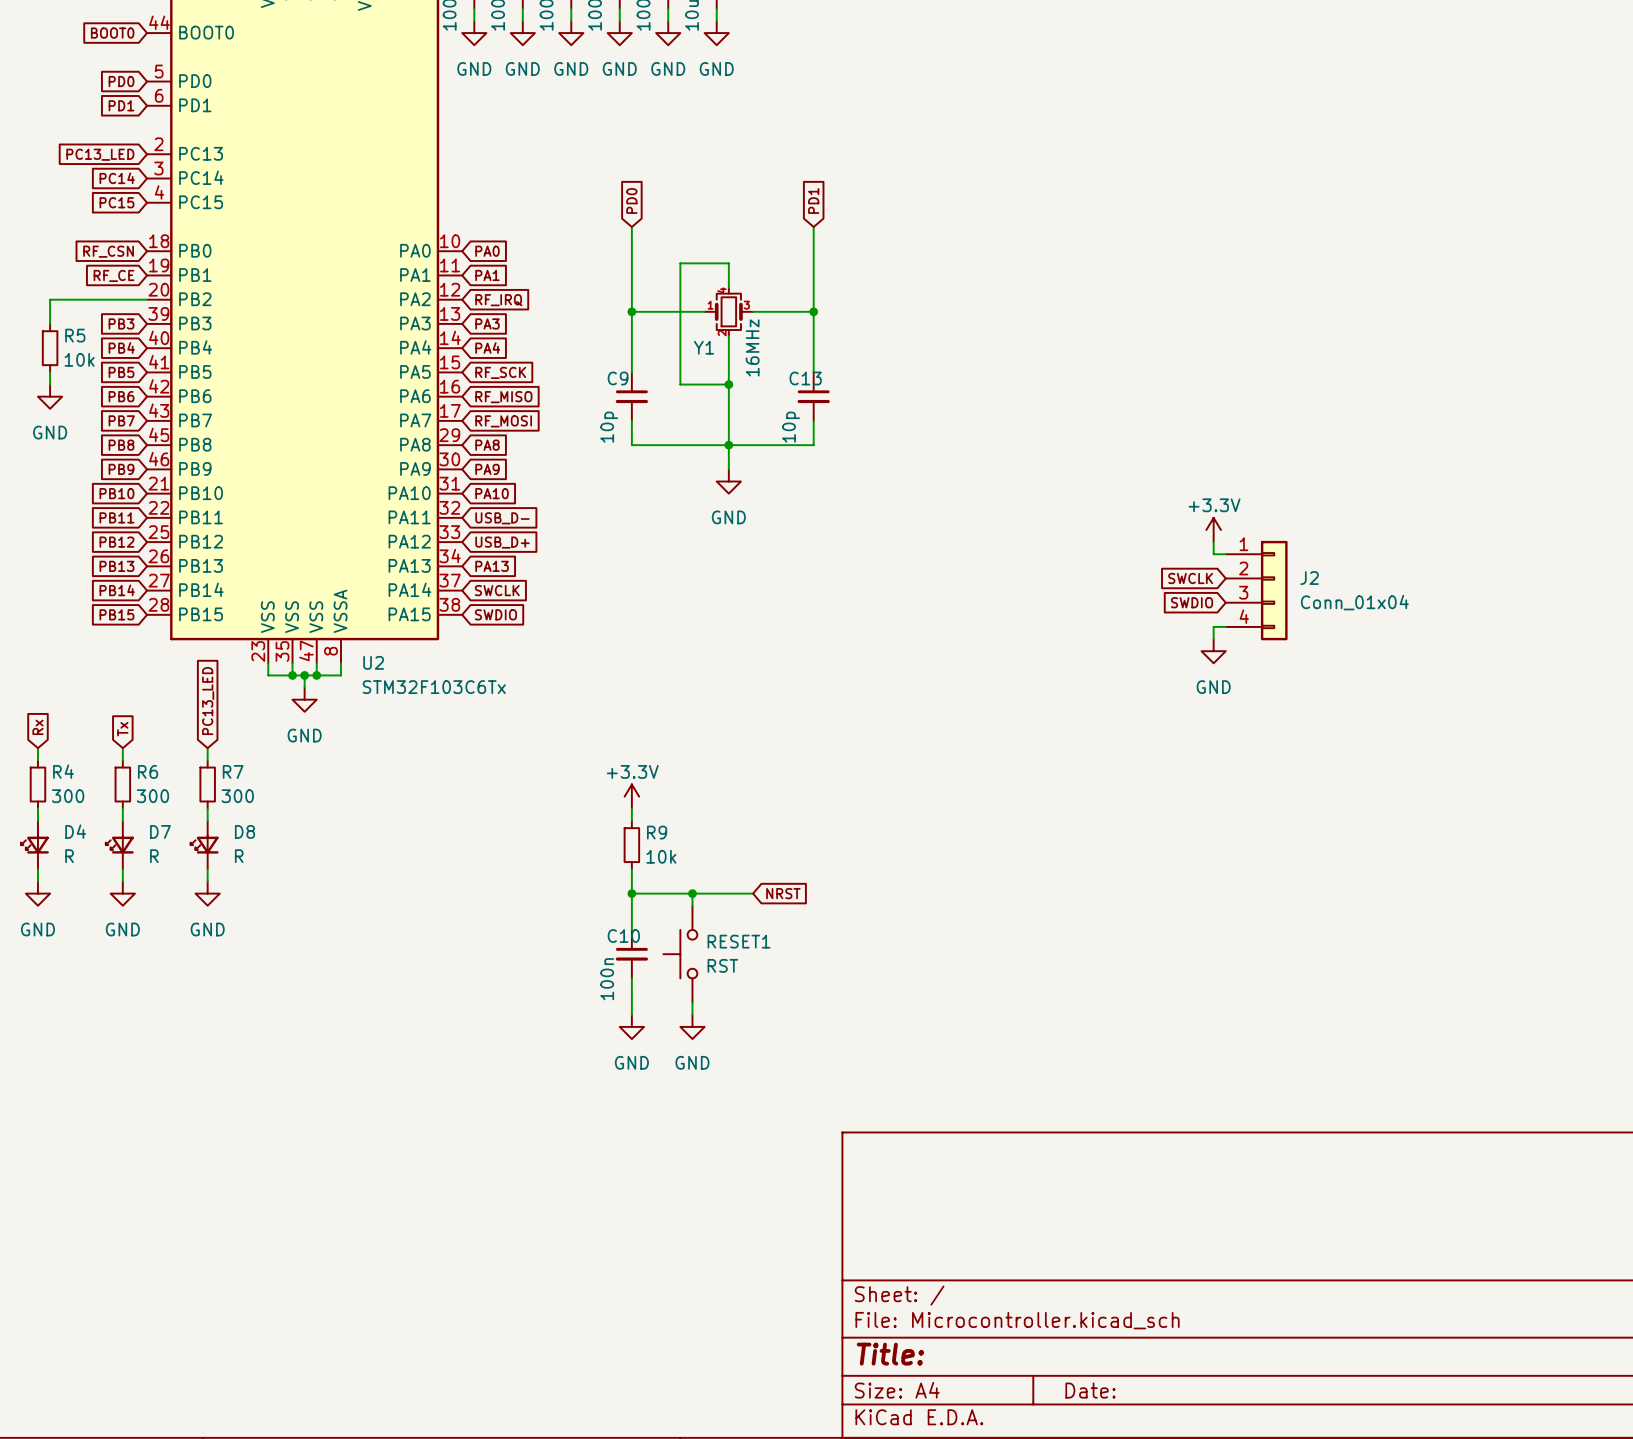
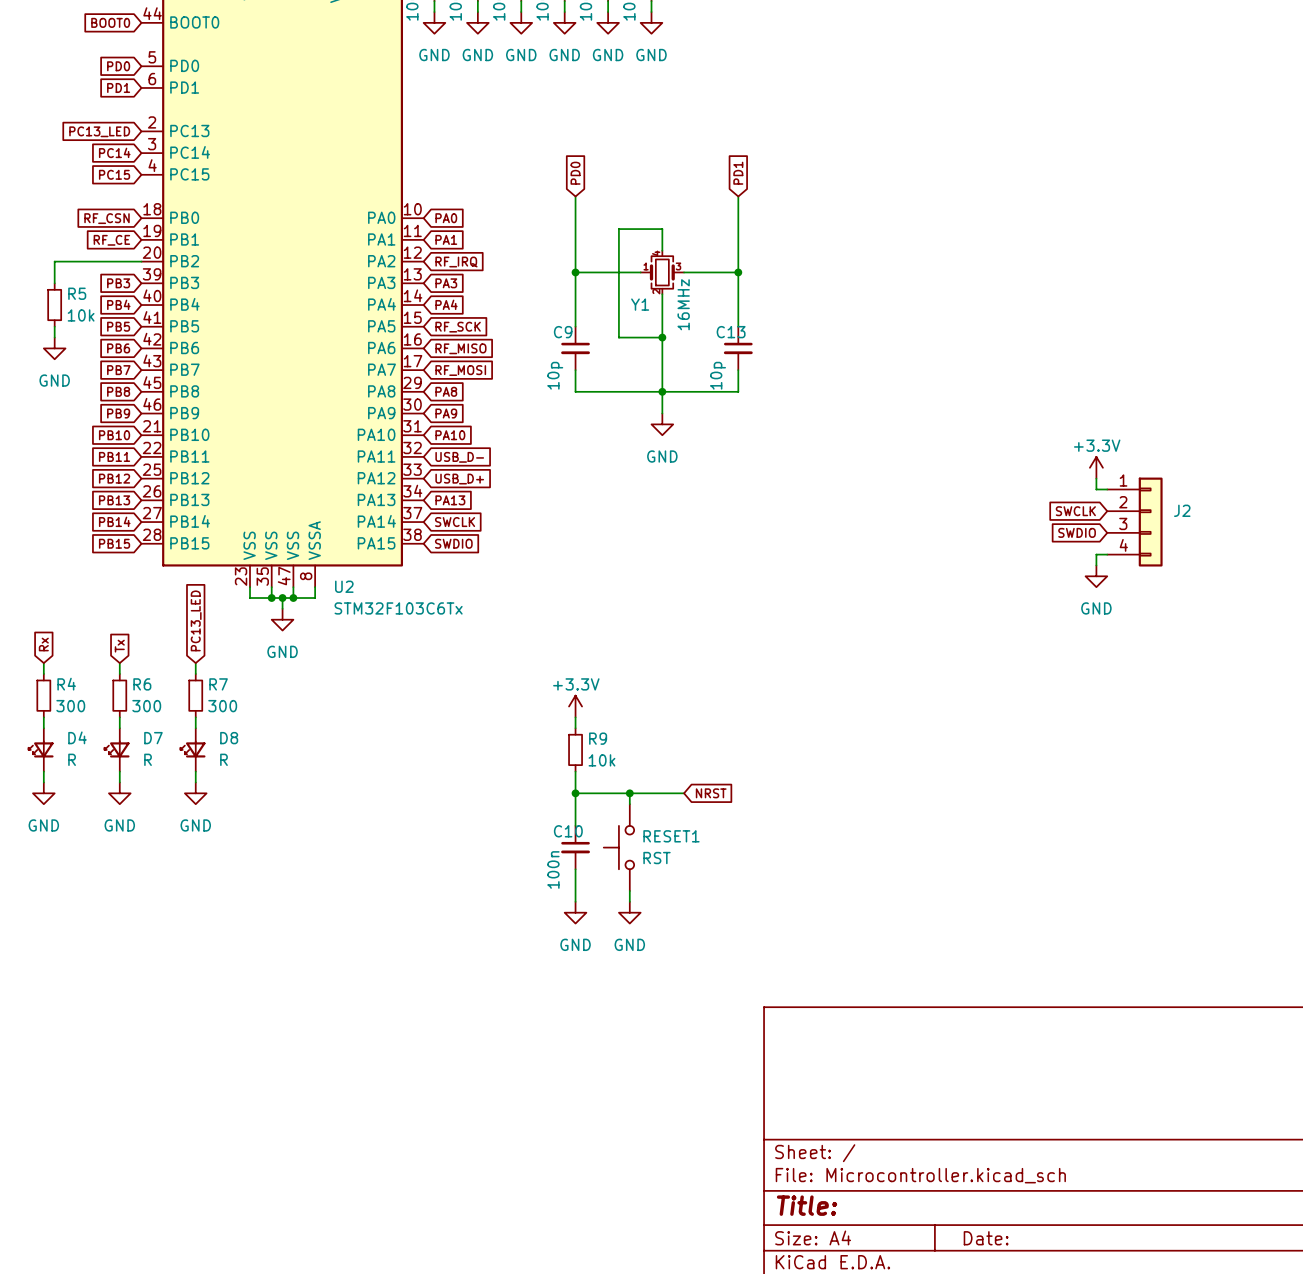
J2 value: Conn_01x04 (1354, 602) -> none

